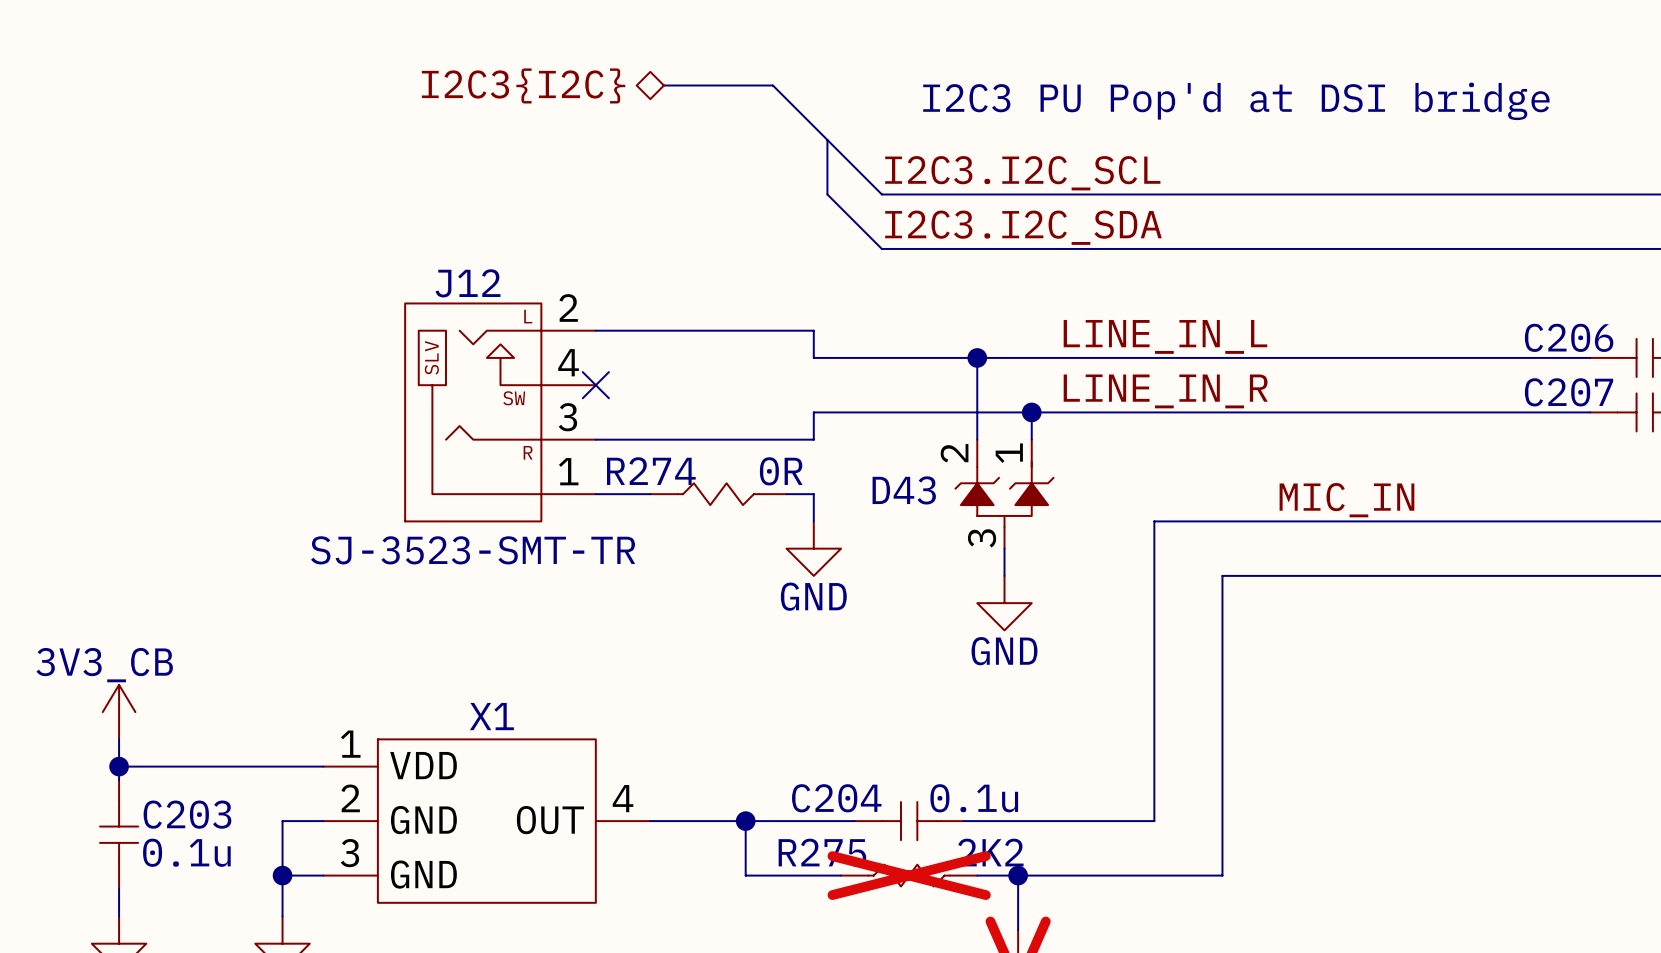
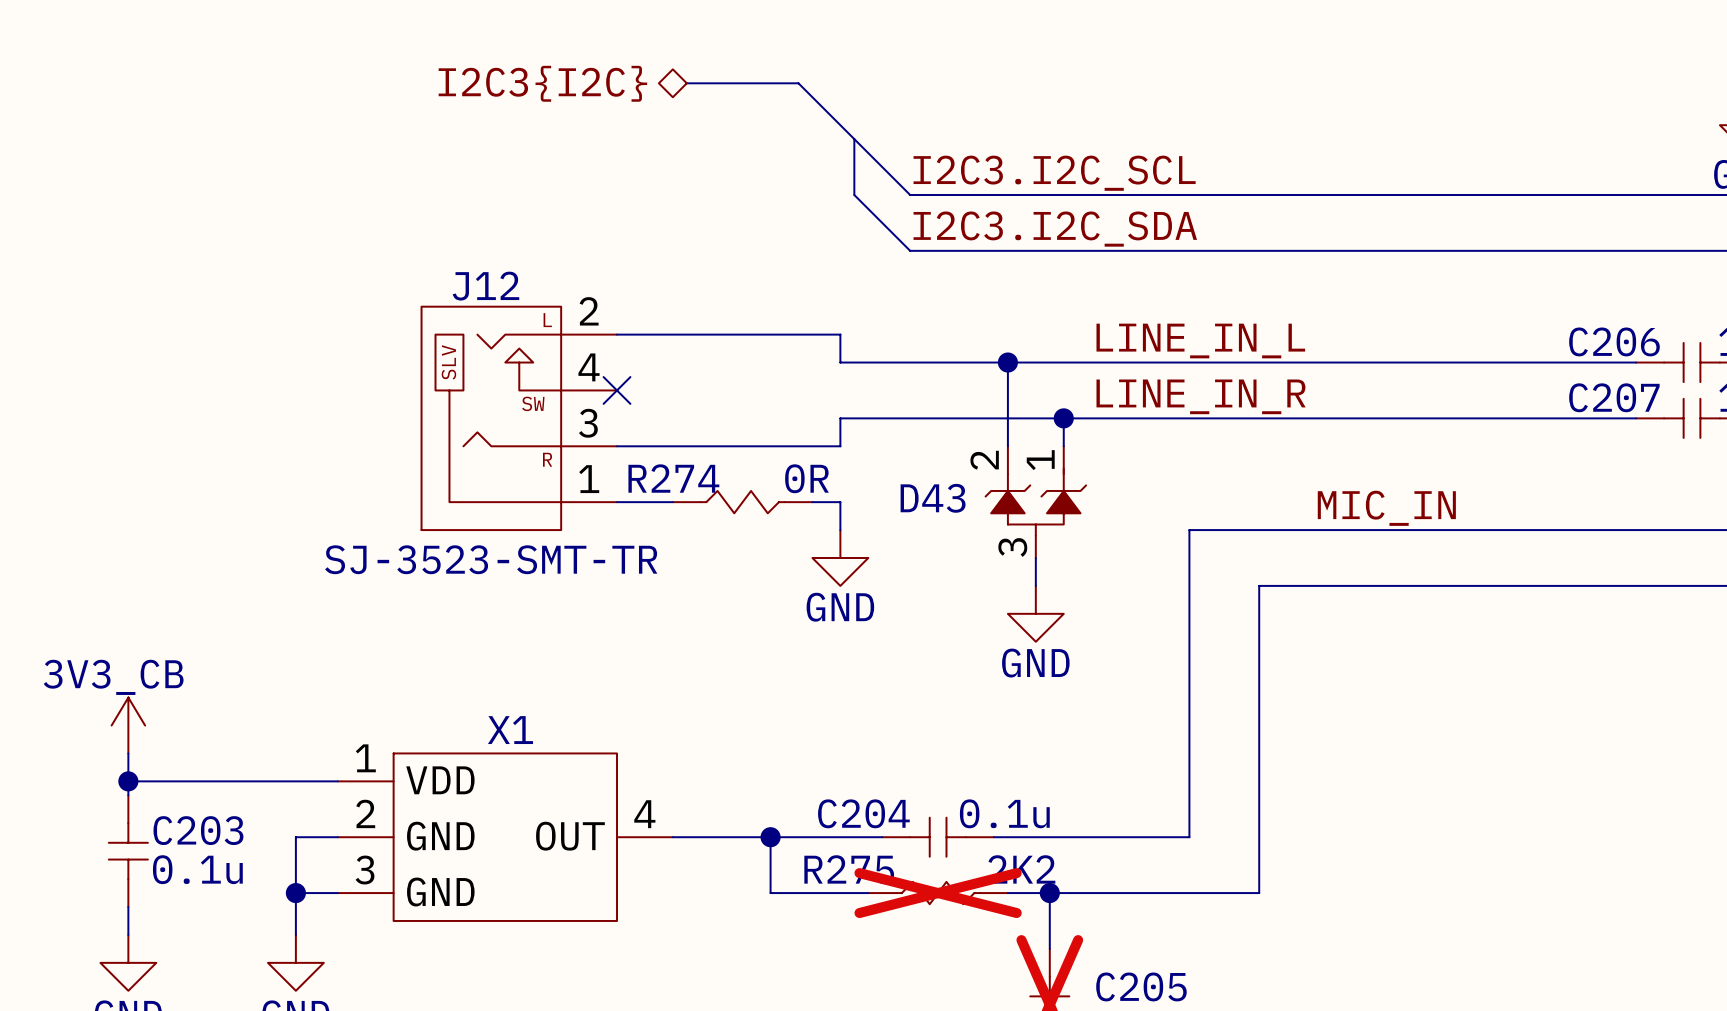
text: I2C3 PU Pop'd at DSI bridge (1236, 101) -> none

